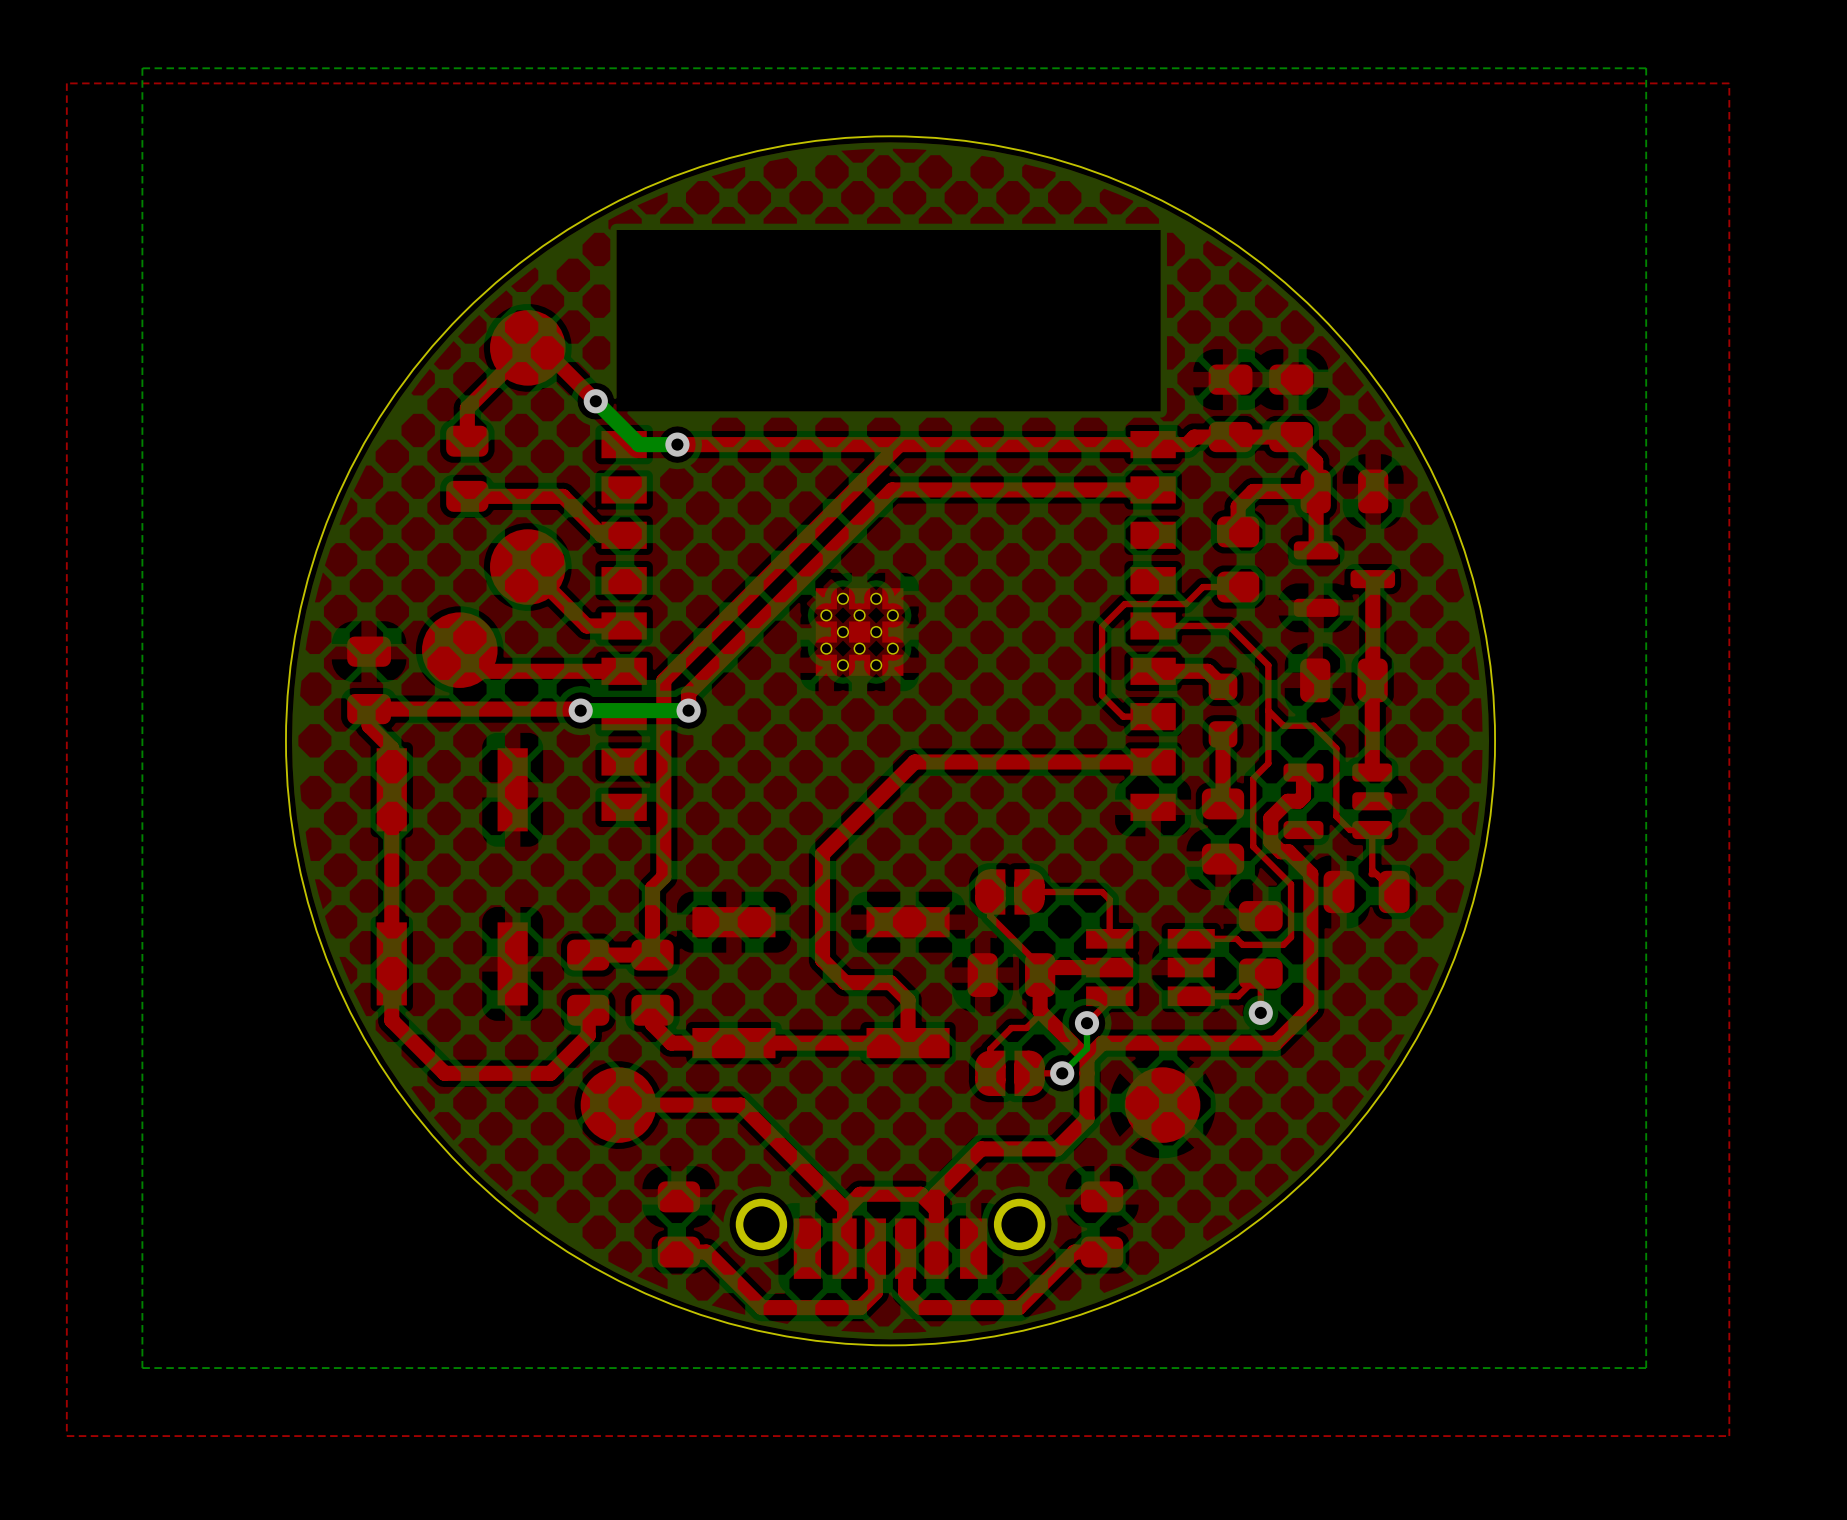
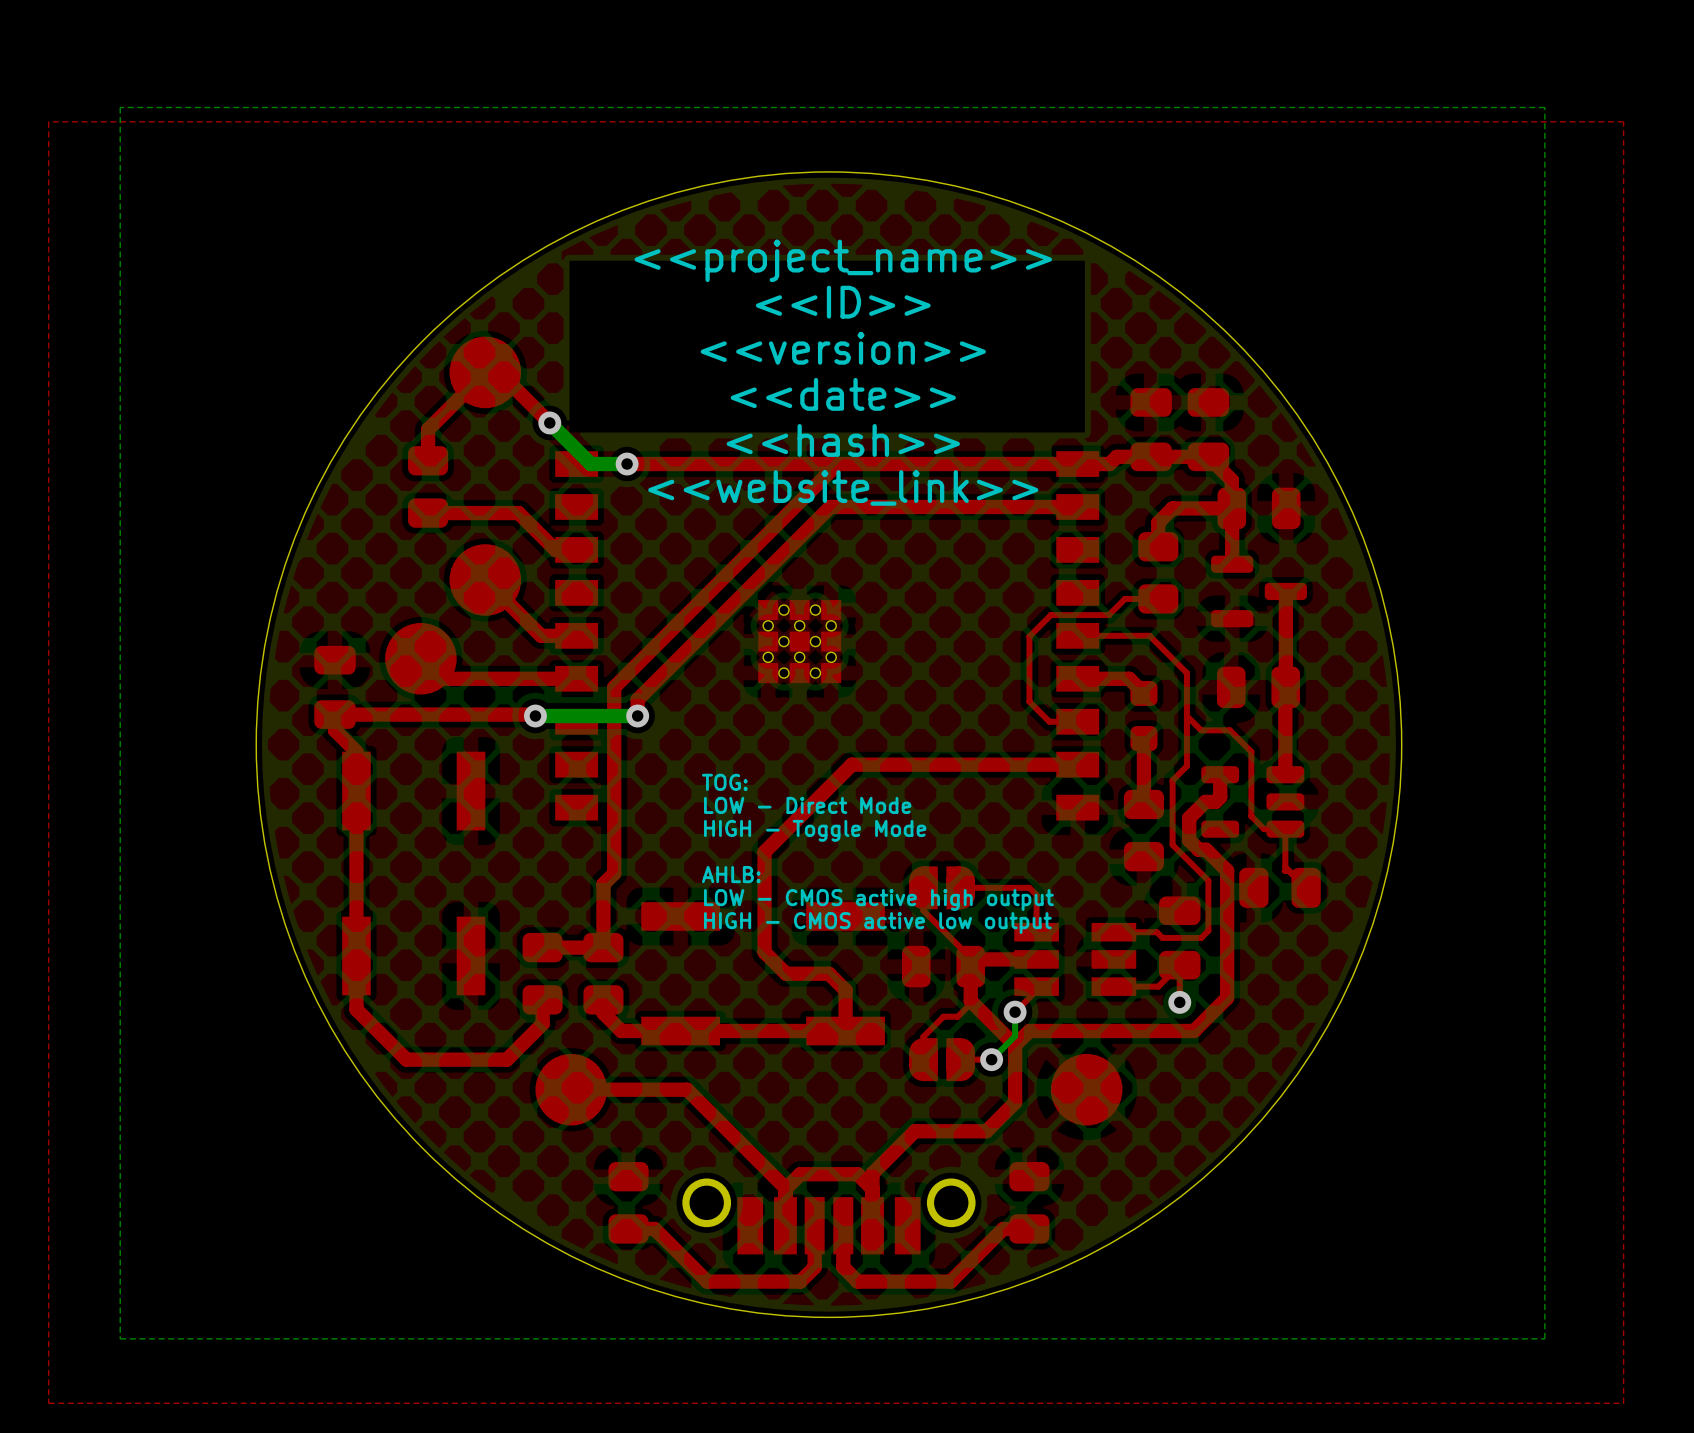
text: none -> <<project_name>> (843, 260)
text: none -> <<ID>> (843, 302)
text: none -> <<version>> (843, 348)
text: none -> <<date>> (843, 394)
text: none -> <<hash>> (843, 440)
text: none -> <<website_link>> (843, 487)
text: none -> TOG: (724, 782)
text: none -> LOW - Direct Mode (807, 805)
text: none -> HIGH - Toggle Mode (815, 830)
text: none -> AHLB: (731, 874)
text: none -> LOW - CMOS active high output (878, 899)
text: none -> HIGH - CMOS active low output (877, 923)

